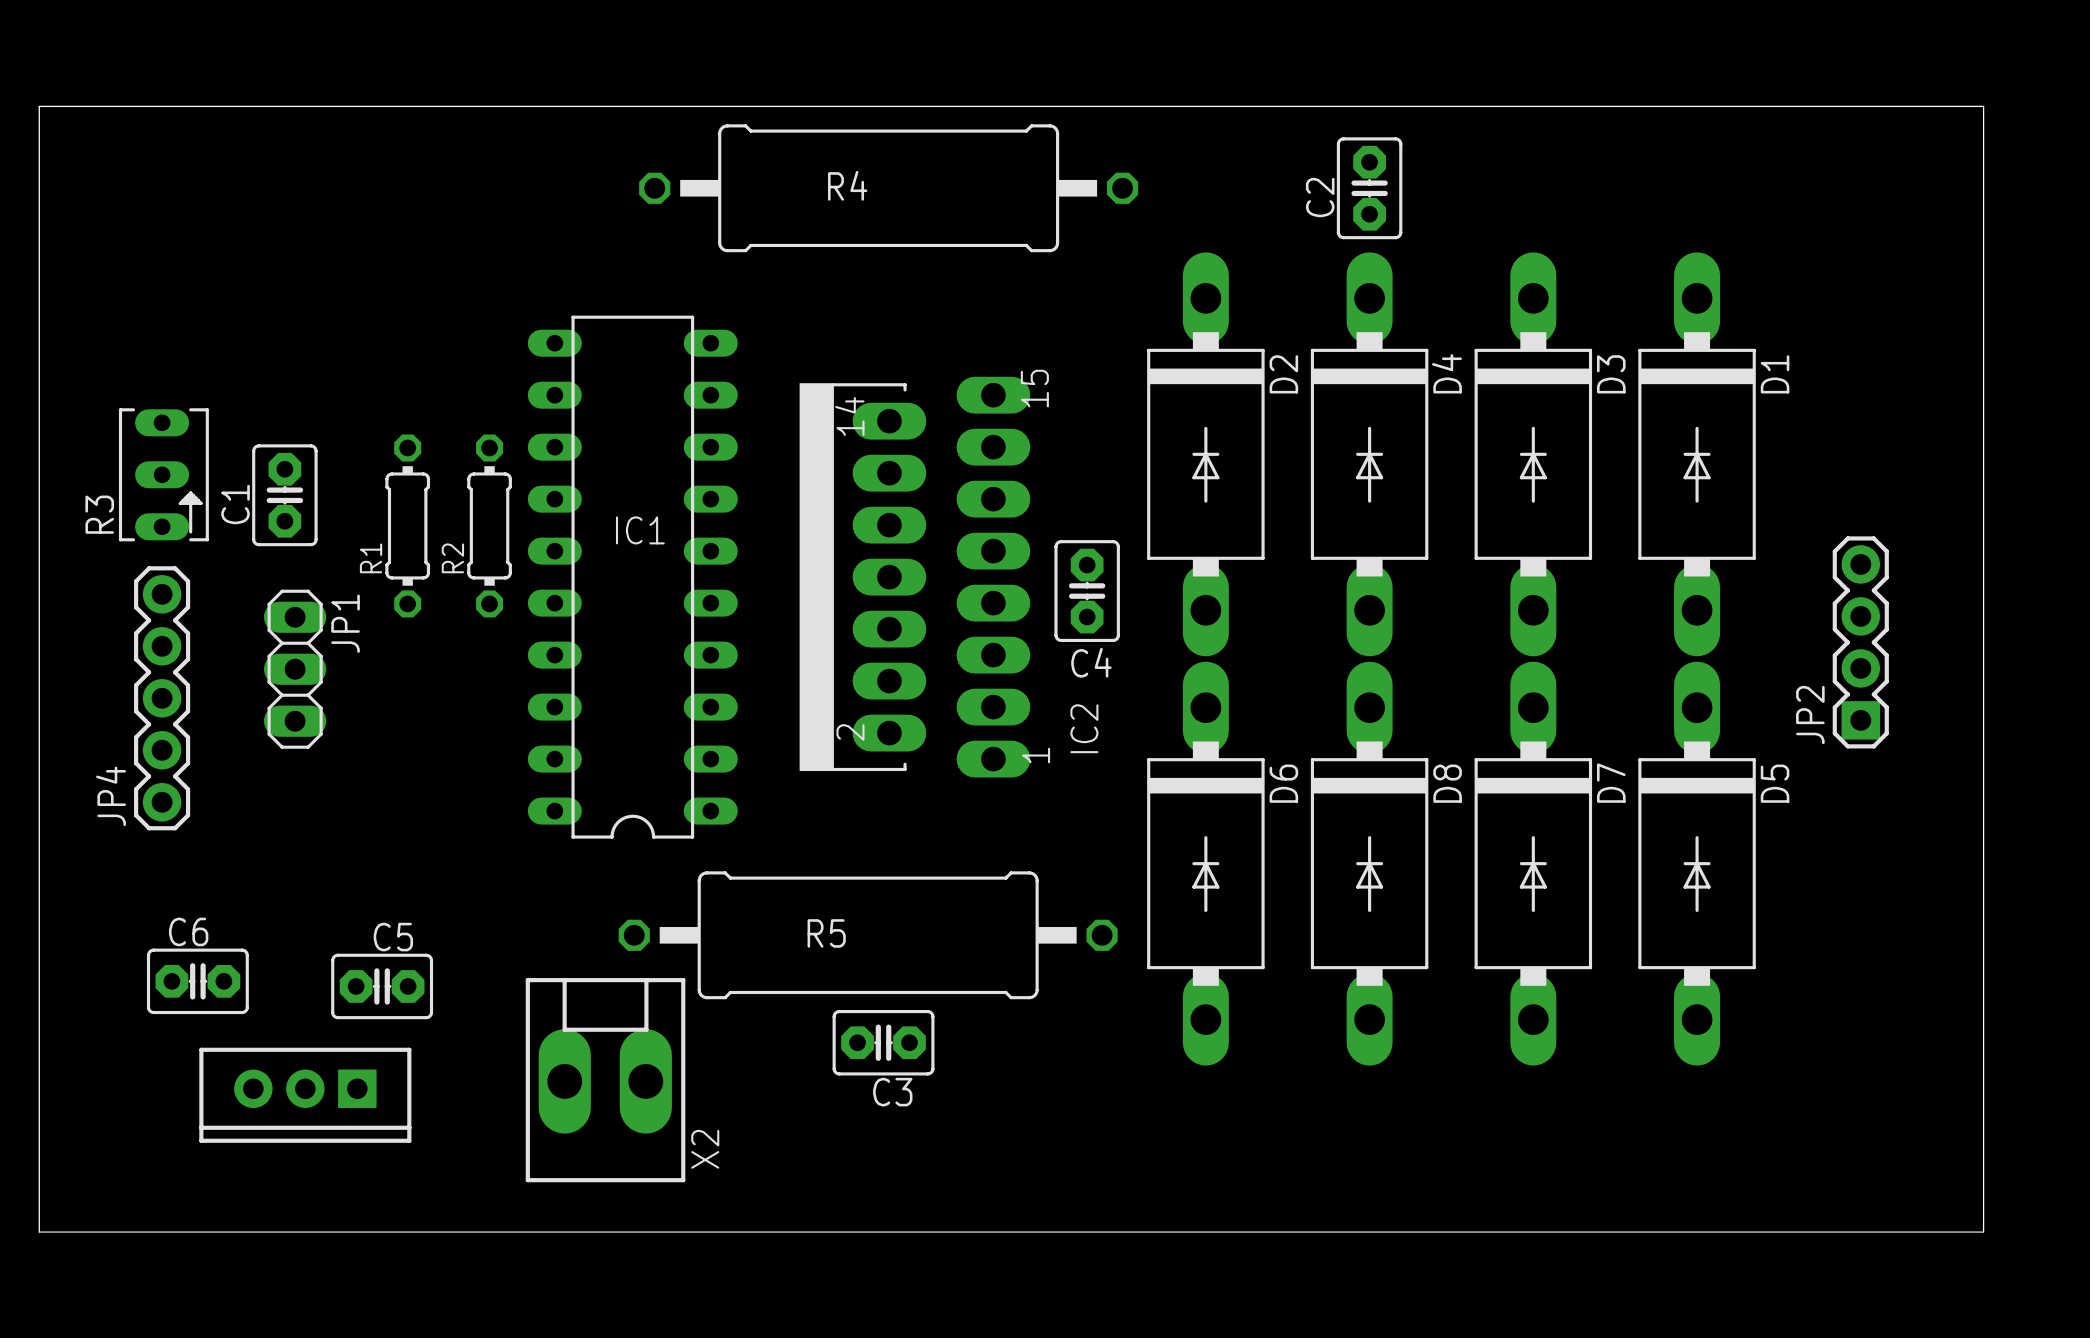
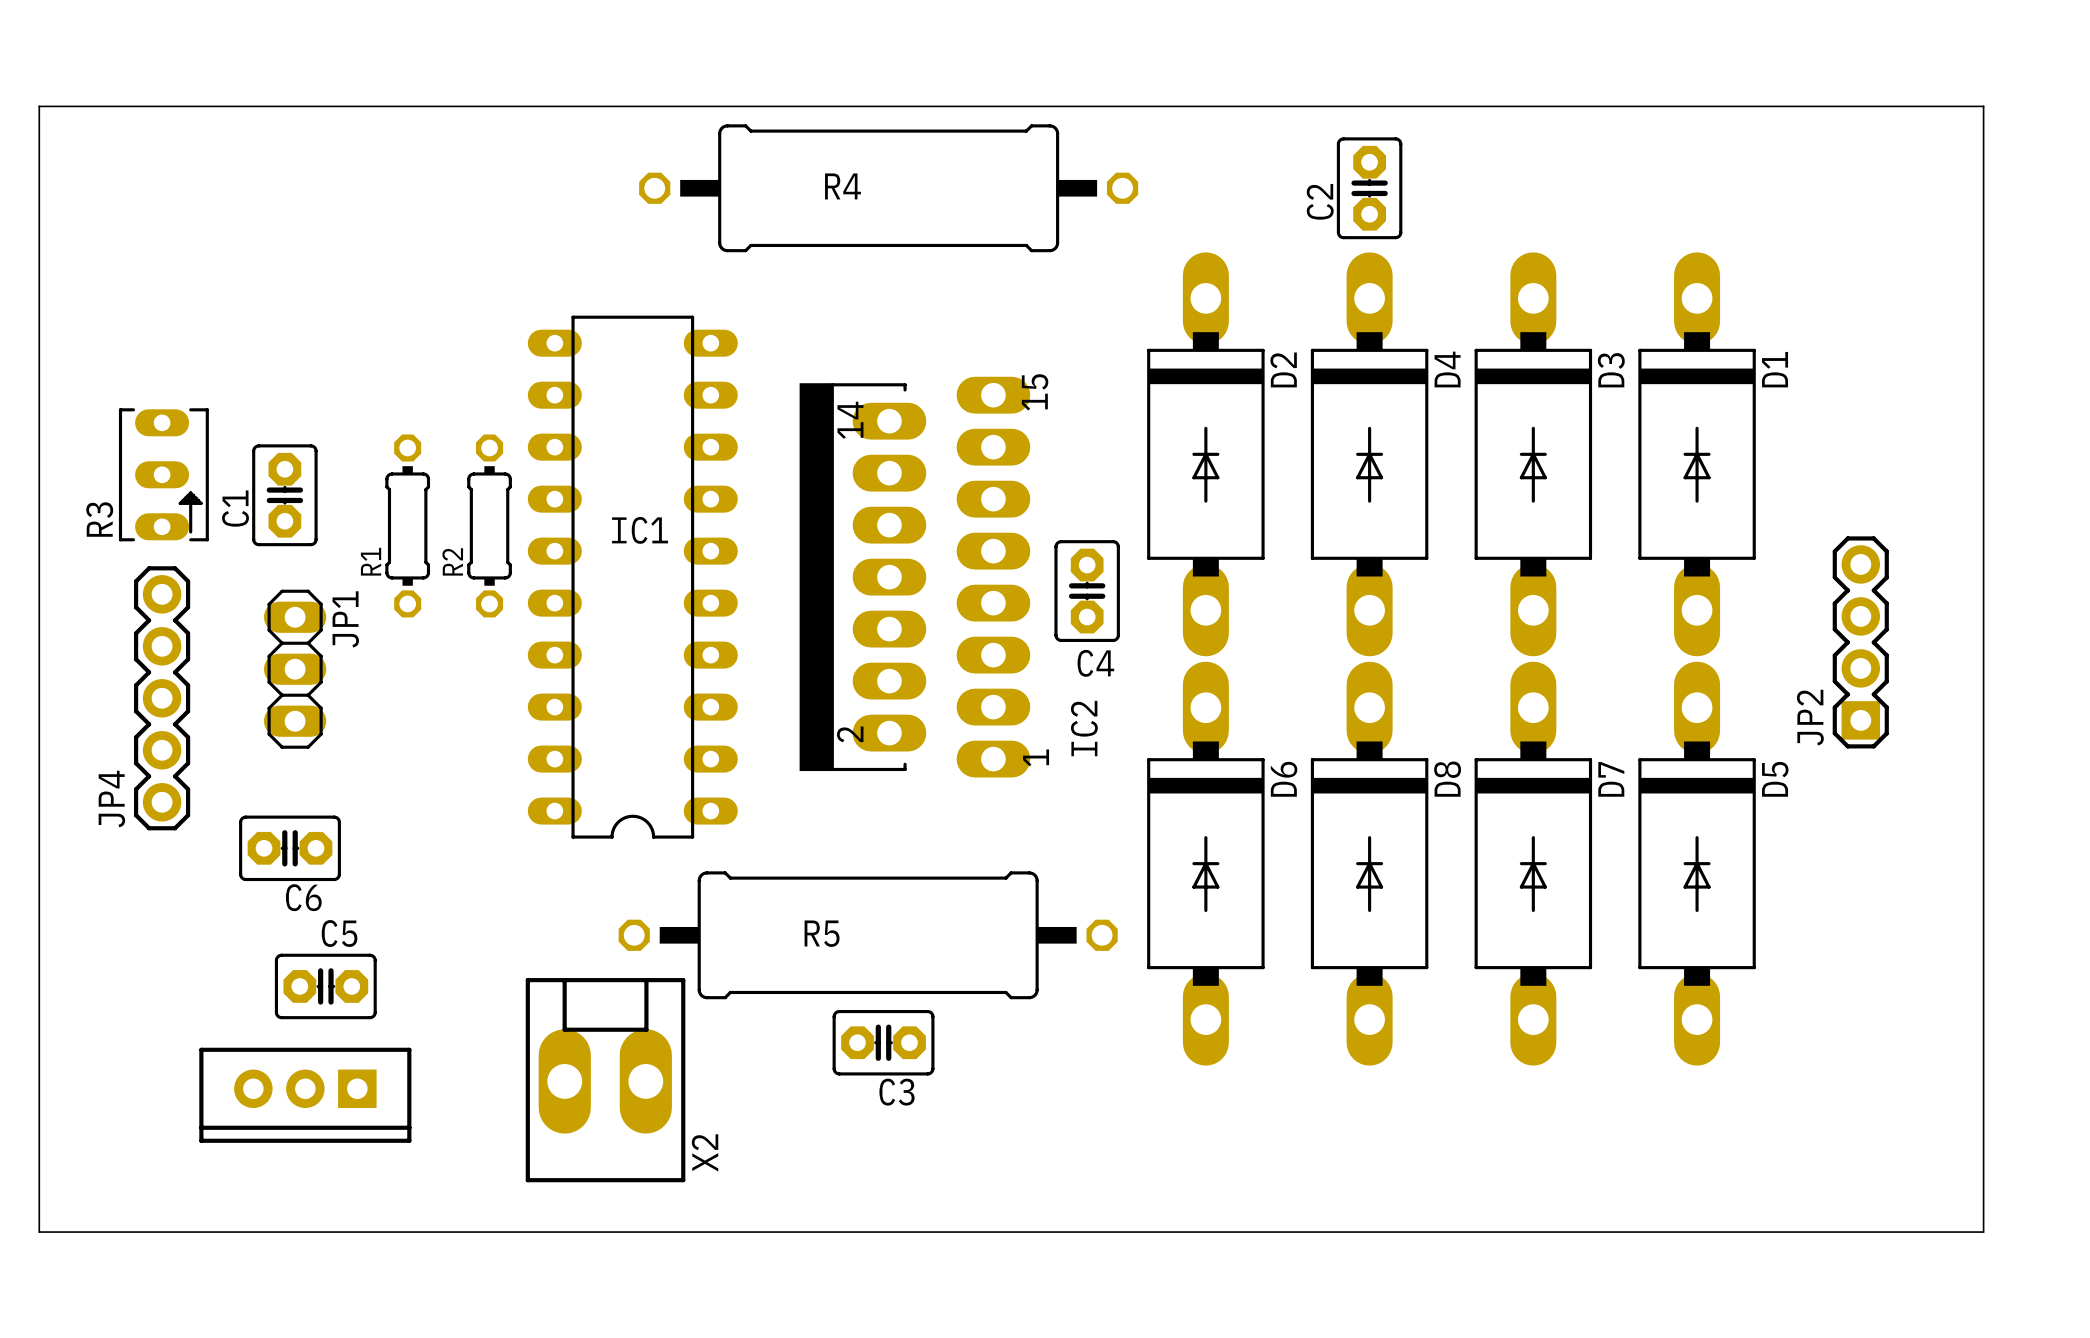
C6 name position: C6 (188, 931) -> C6 (303, 897)
C5 name position: C5 (393, 937) -> C5 (339, 933)
C6 position: (197, 981) -> (290, 848)
C5 position: (382, 986) -> (325, 986)

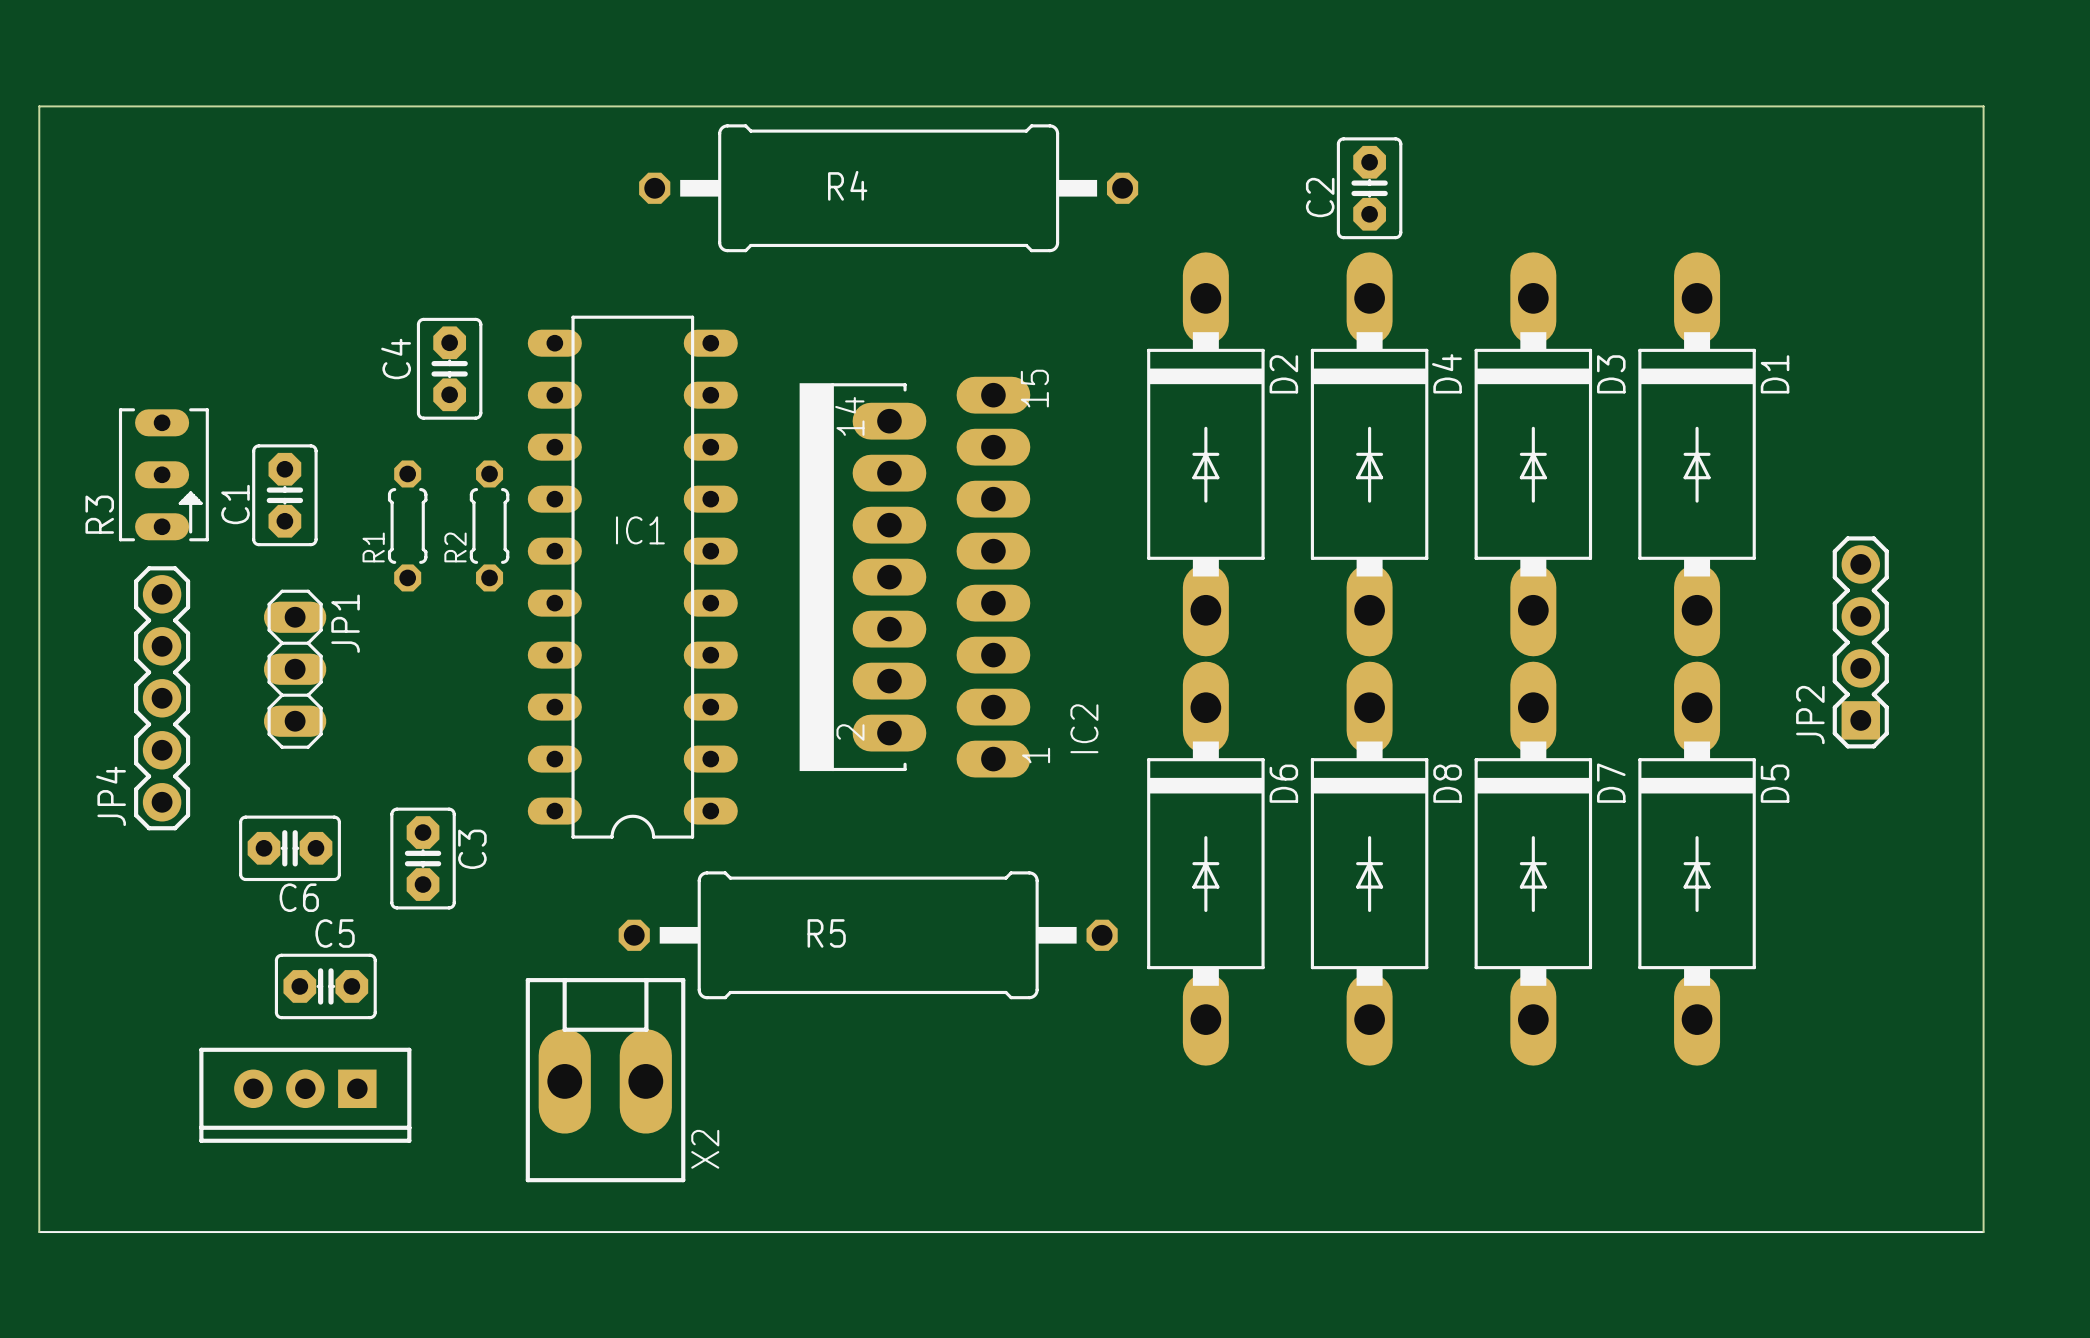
R1 footprint: [385, 434, 431, 618] -> [387, 460, 428, 592]
R2 footprint: [467, 434, 512, 618] -> [469, 460, 510, 592]
C4 position: (1087, 591) -> (449, 368)
C4 name rotation: 0° (1095, 663) -> 90° counterclockwise (396, 358)
C4 name position: C4 (1095, 663) -> C4 (396, 358)
C3 rotation: 0° (883, 1042) -> 90° clockwise (423, 858)
C3 position: (883, 1042) -> (423, 858)
C3 name position: C3 (897, 1092) -> C3 (472, 849)

